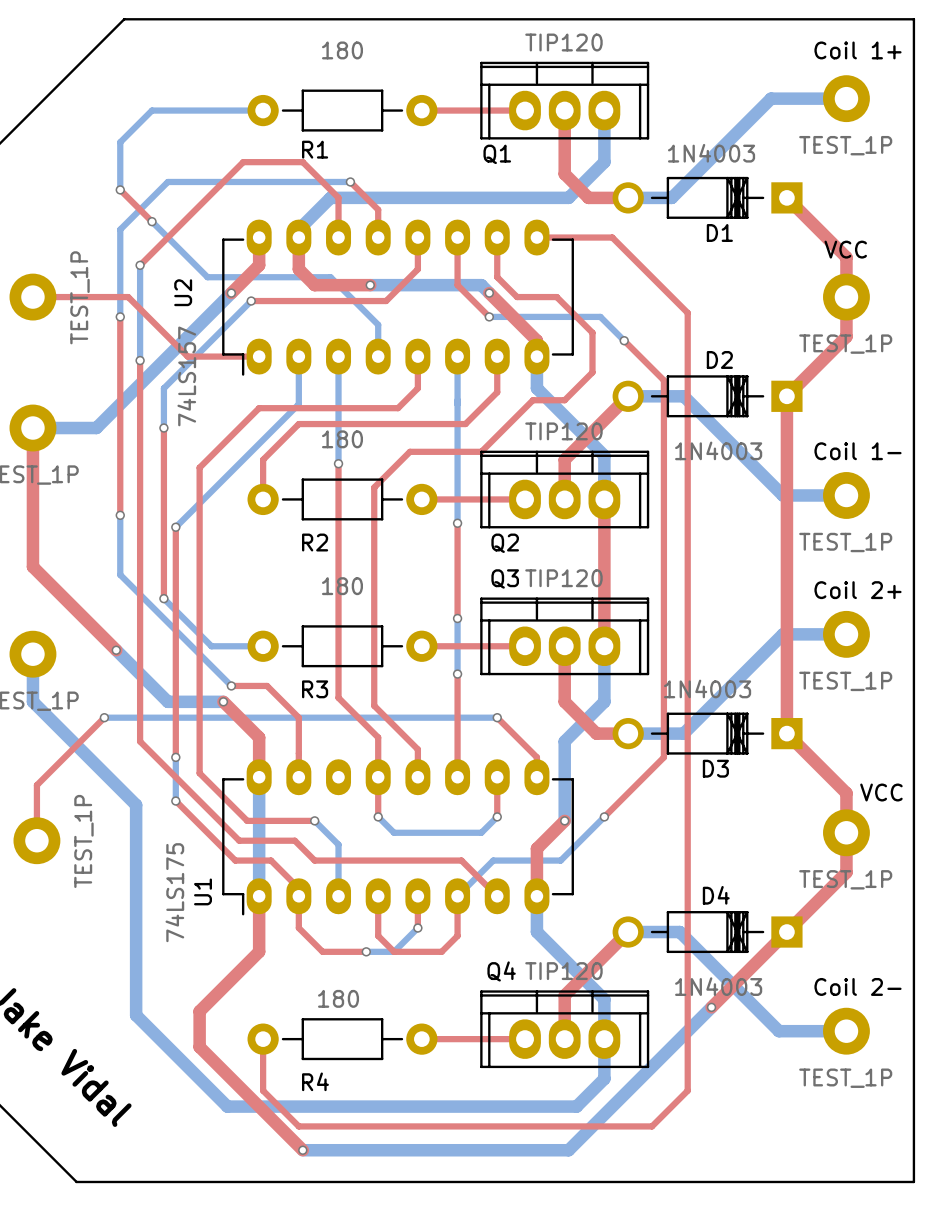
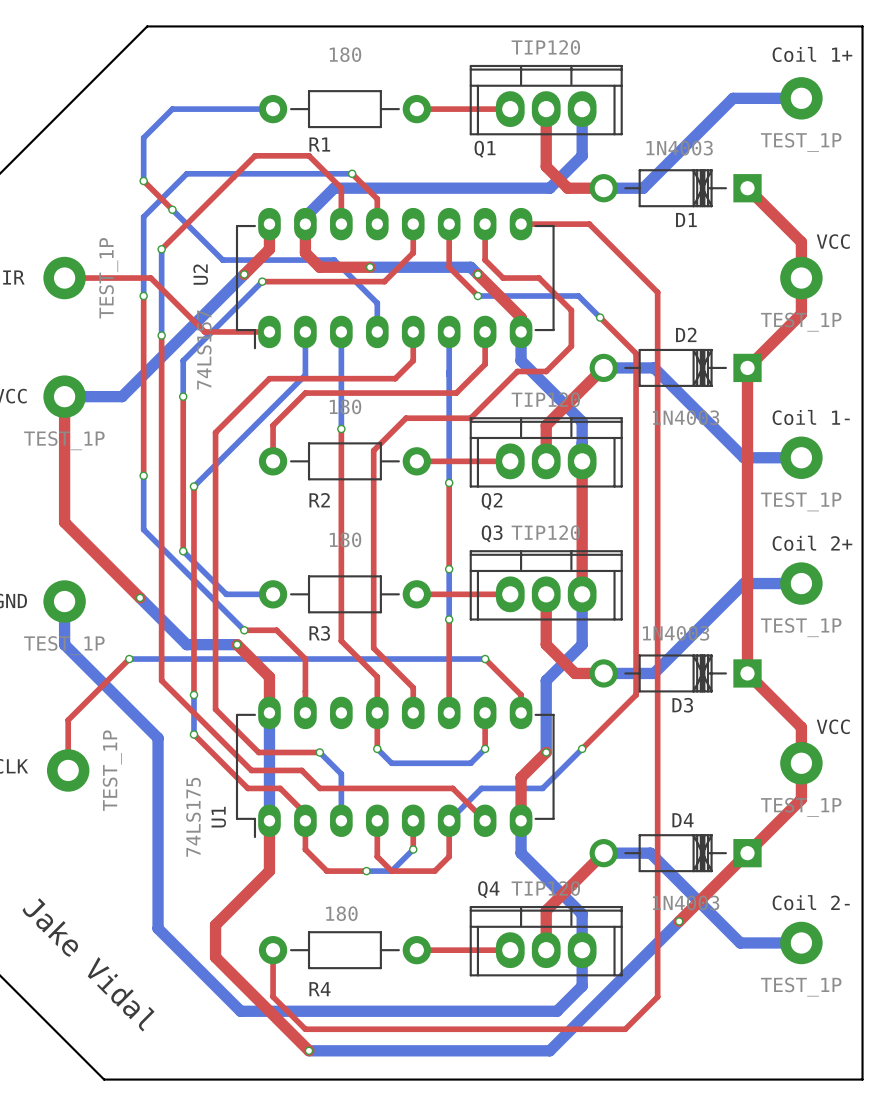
VCC name position: VCC (845, 249) -> VCC (833, 241)

